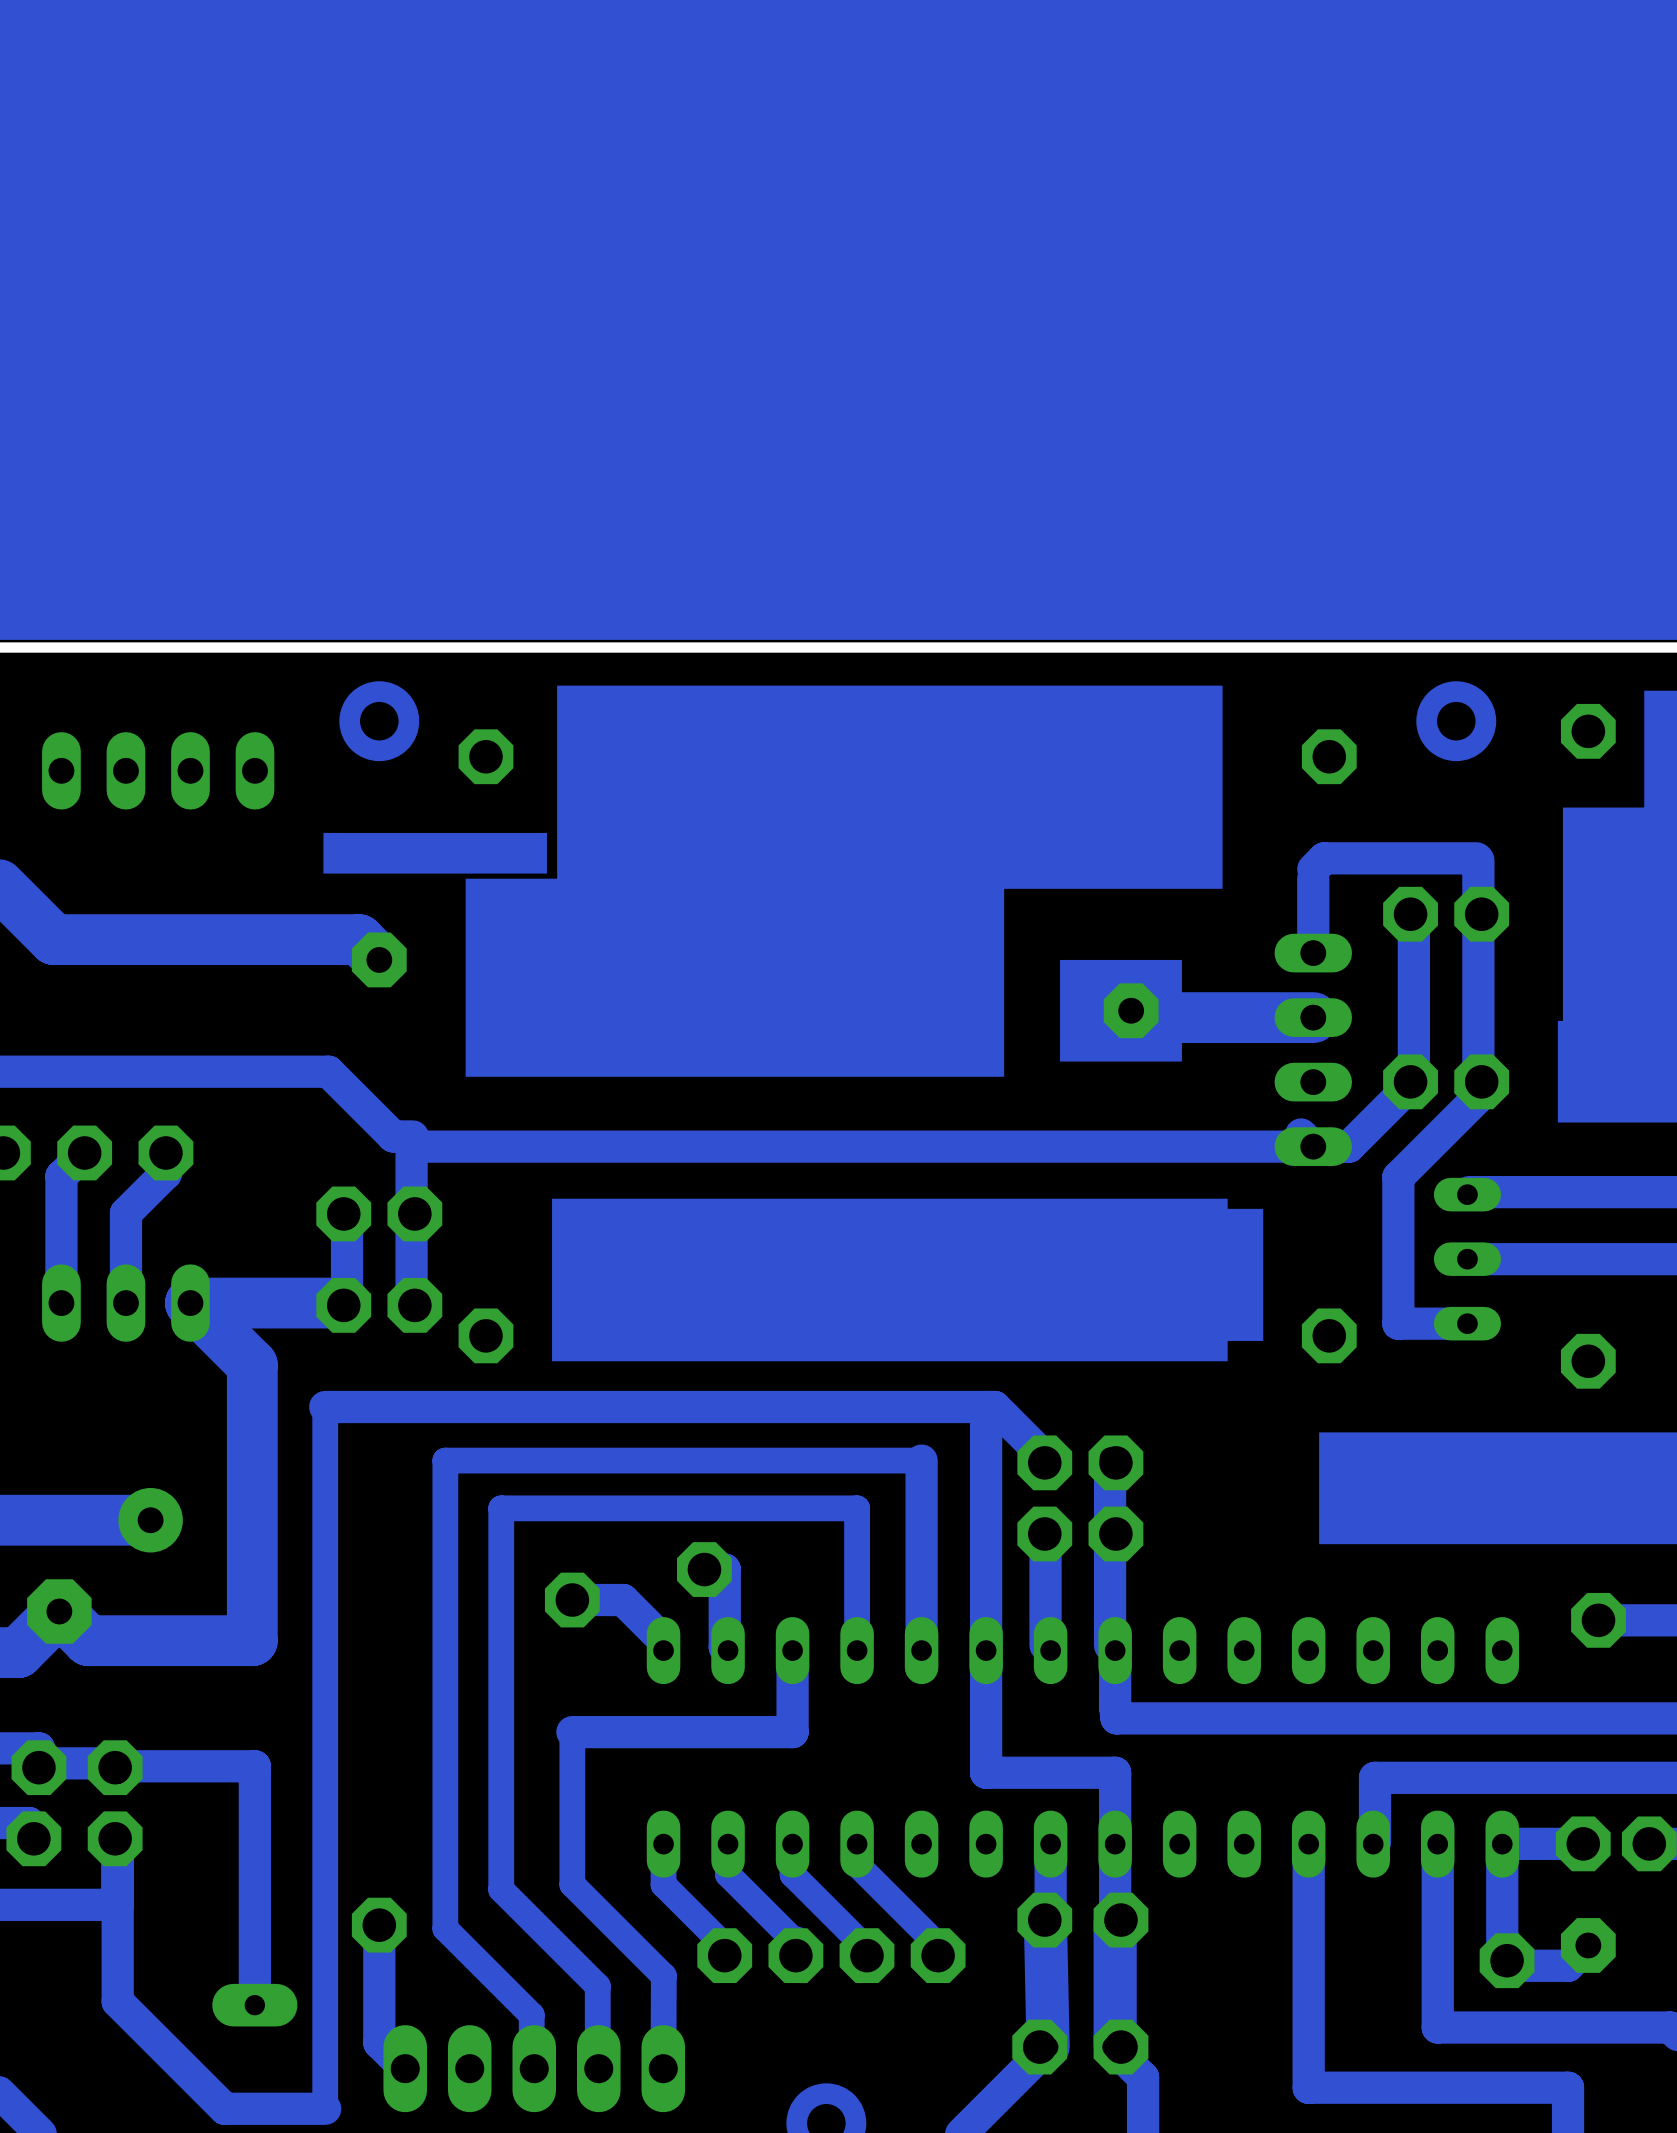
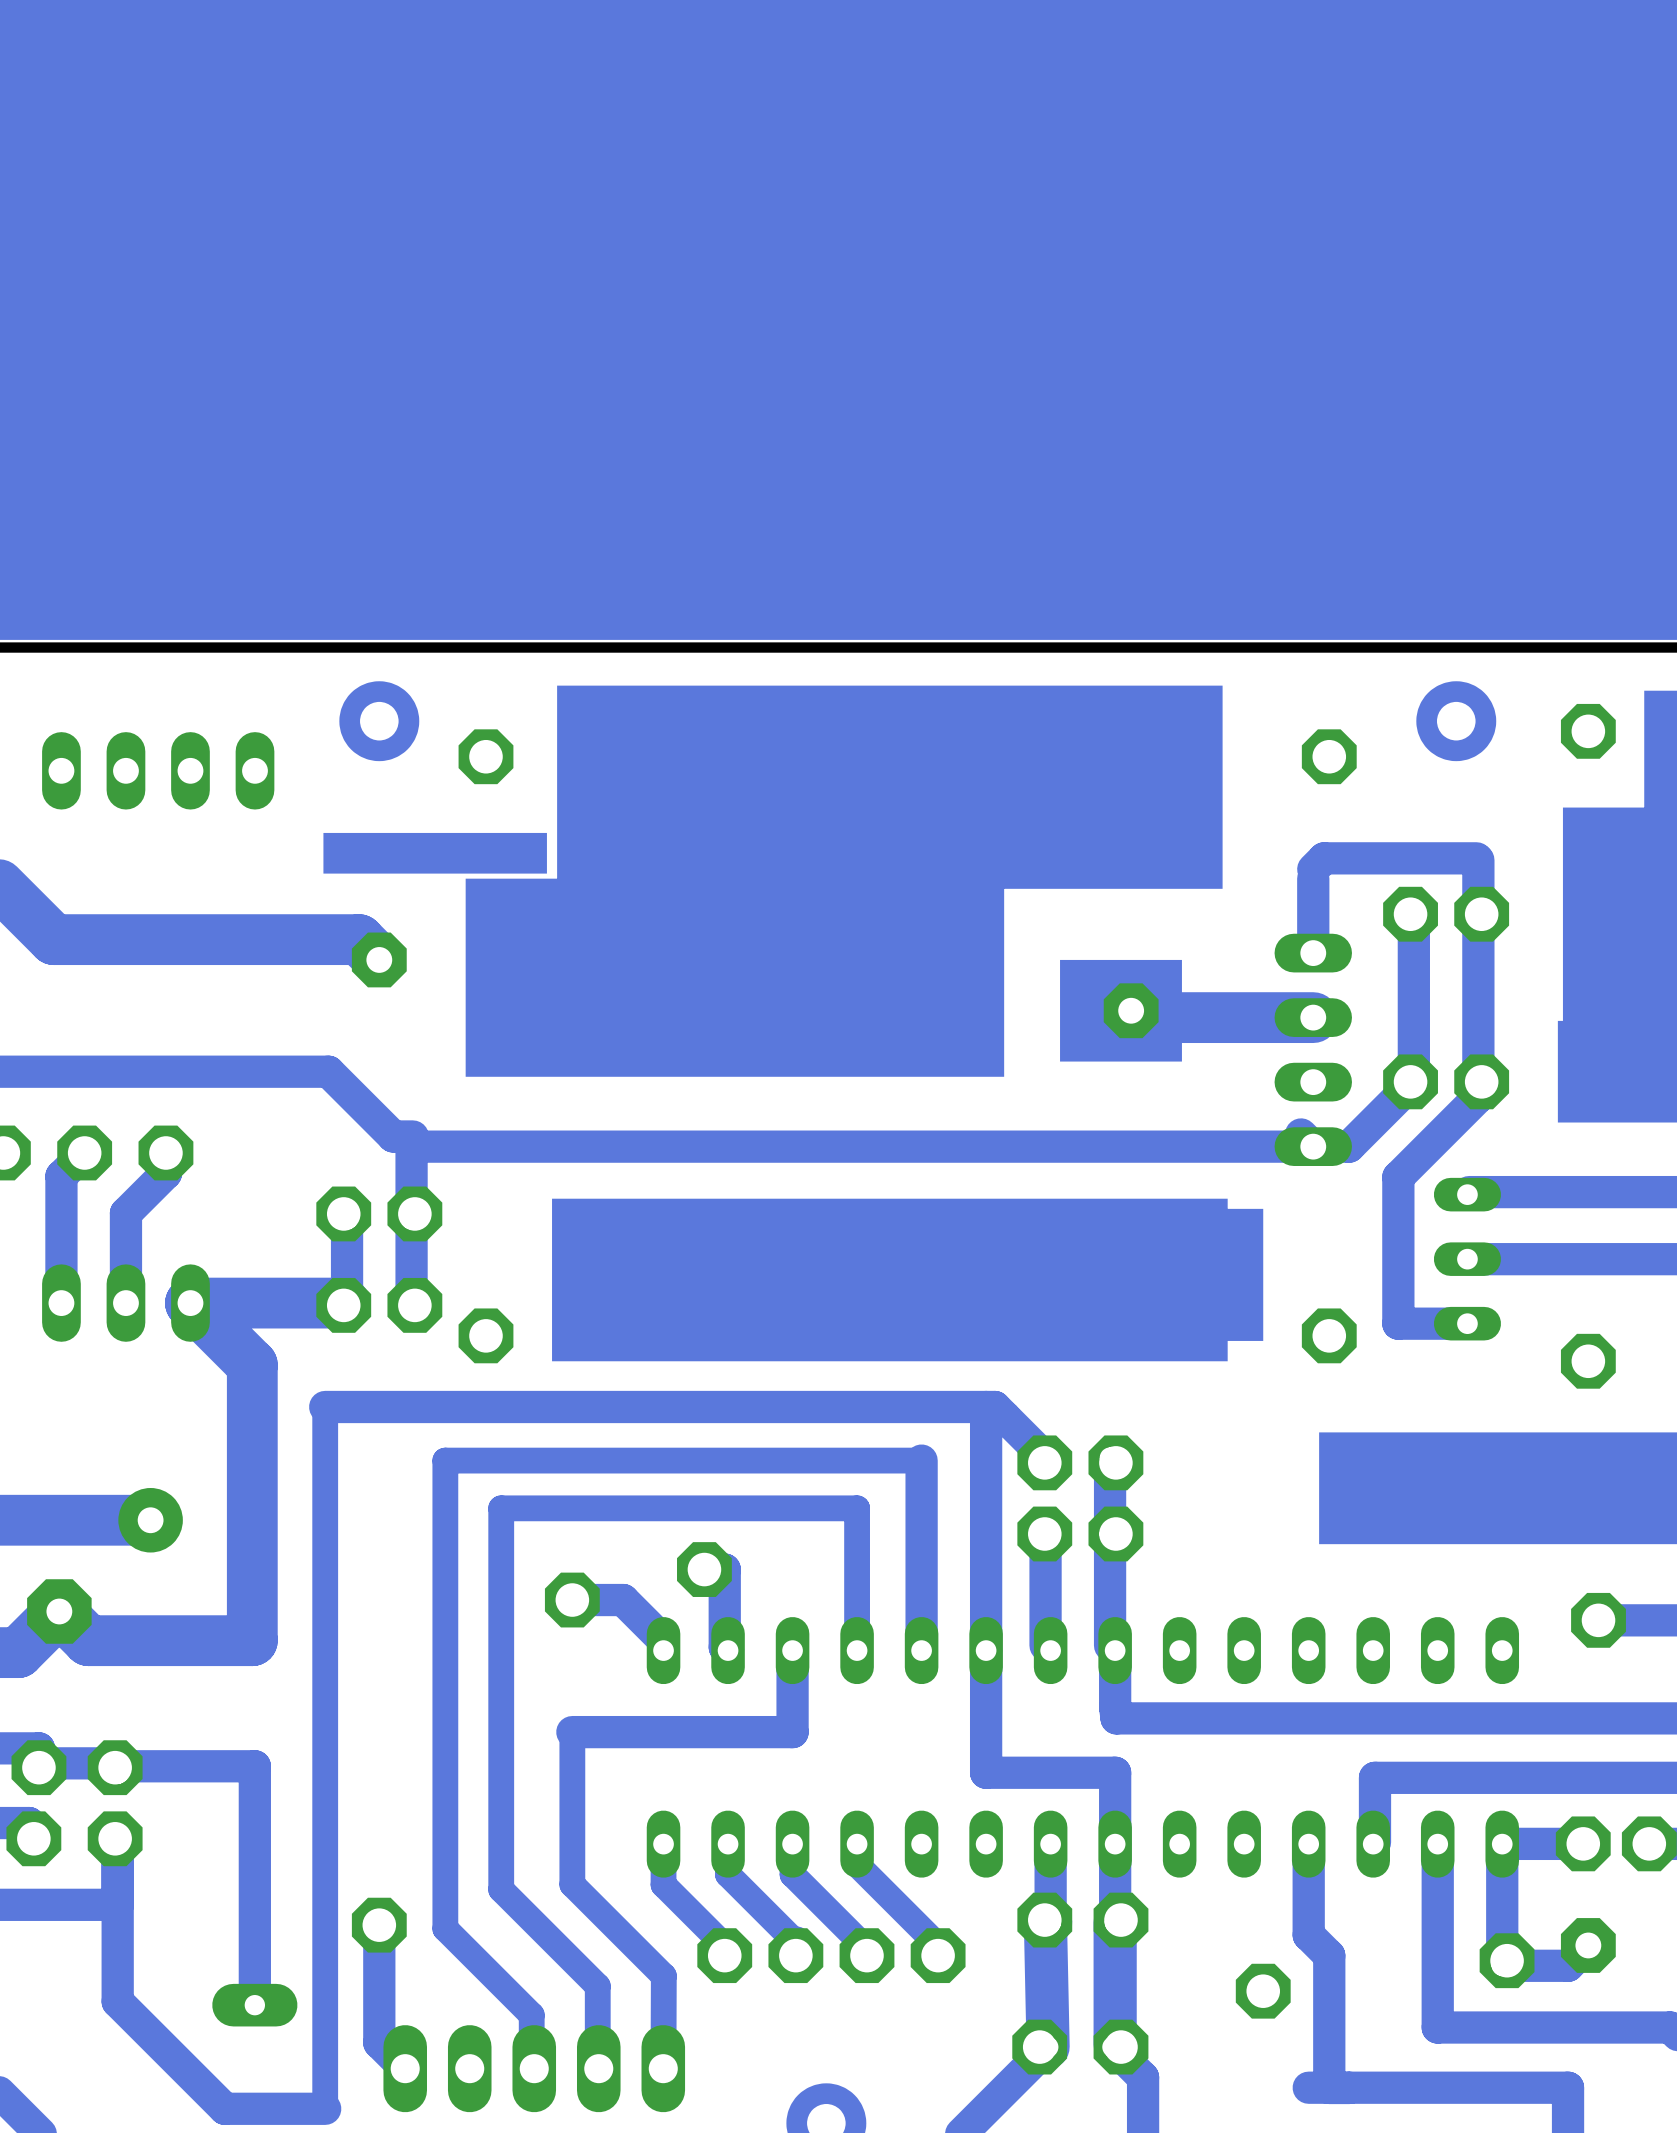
bottom track: (1308, 1935) (1308, 2087) -> (1308, 1935) (1329, 1955) (1329, 2087) (1349, 2087)
part: none -> (1263, 1991)

